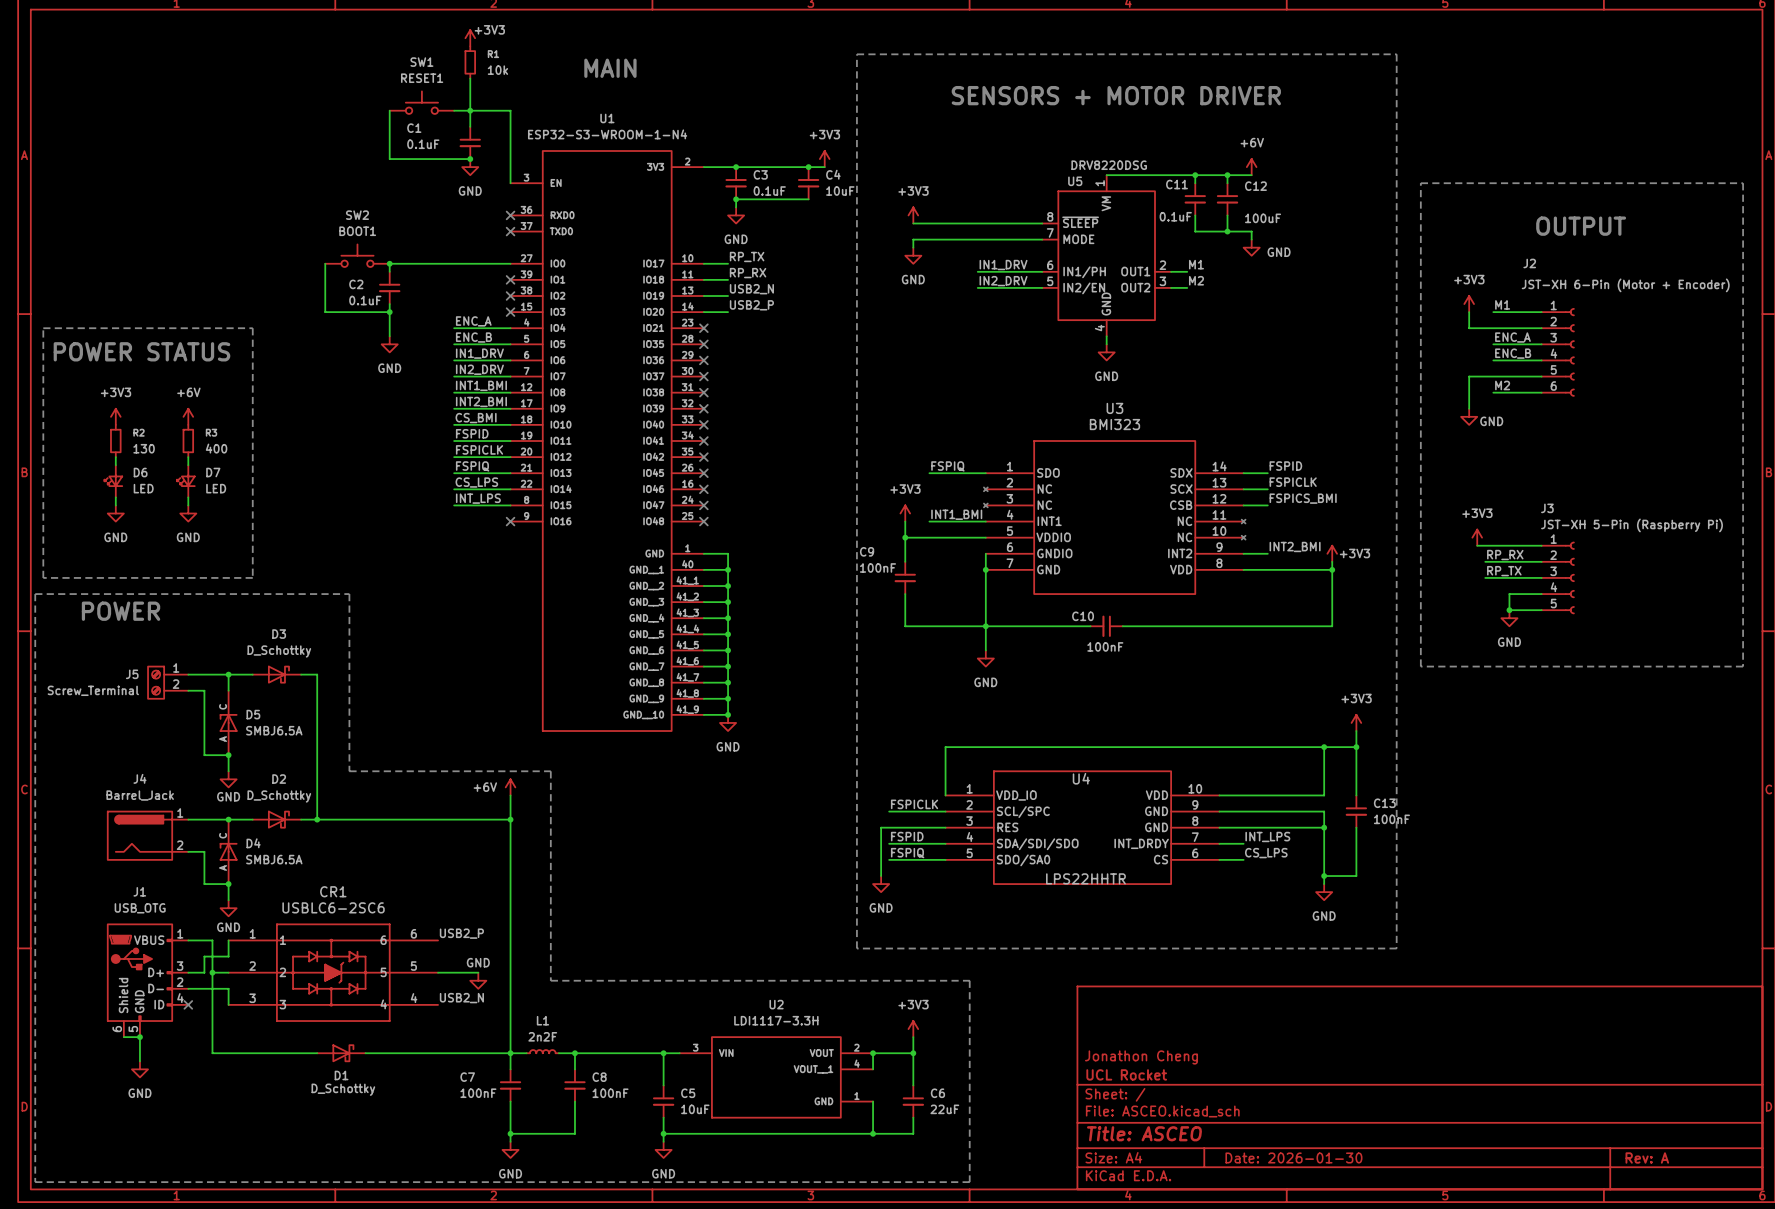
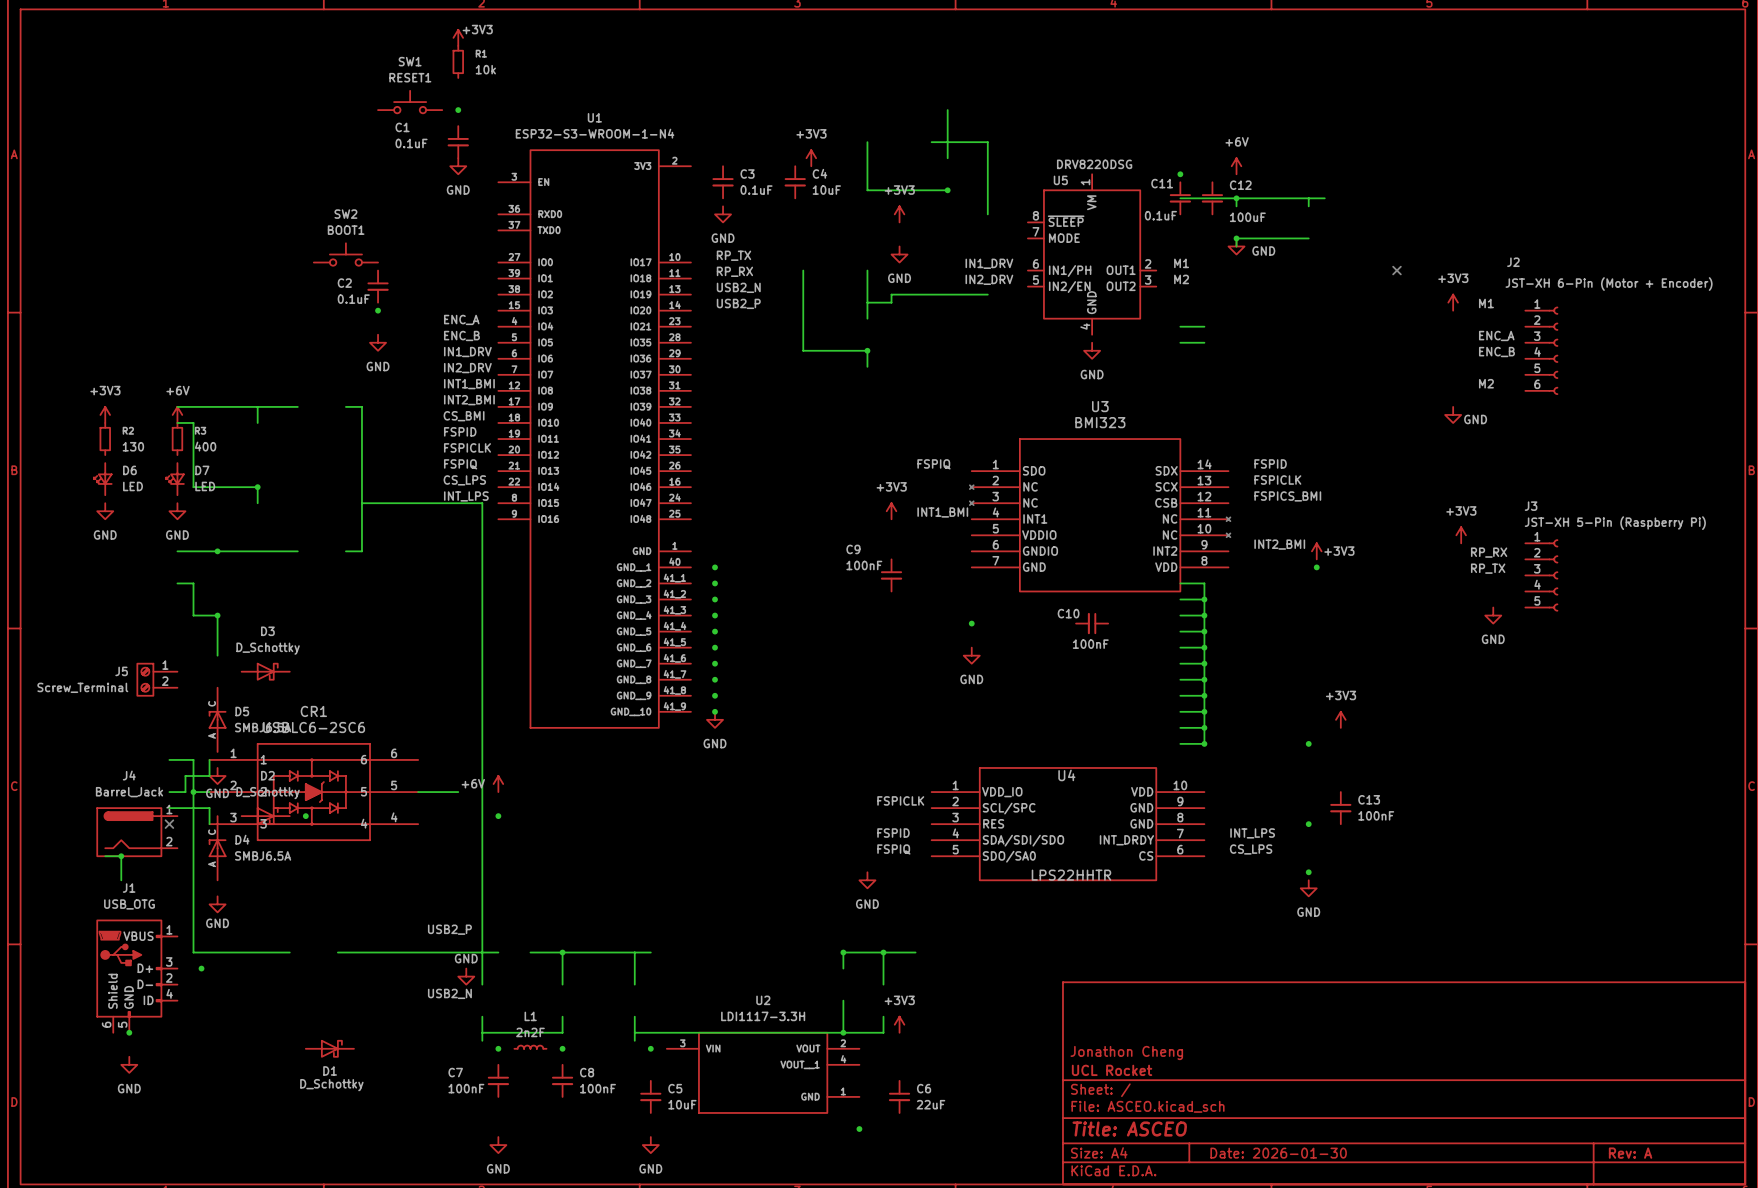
line: (856, 54) (1396, 54) (1396, 948) (856, 948) (856, 54) -> none
text: MAIN (610, 68) -> none
wire: (470, 78) (470, 126) -> none
text: SENSORS + MOTOR DRIVER (1116, 95) -> none
wire: (389, 110) (389, 159) (470, 159) -> none
wire: (454, 110) (510, 110) (510, 183) -> none
wire: none -> (947, 110) (947, 158)
wire: none -> (867, 142) (867, 190) (947, 190)
wire: none -> (931, 142) (987, 142) (987, 214)
junction: (470, 159) -> none
wire: (703, 167) (824, 167) -> none
junction: (736, 167) -> none
junction: (808, 167) -> none
wire: (1106, 175) (1251, 175) -> (1180, 198) (1324, 198)
wire: (1195, 175) (1195, 183) -> (1308, 198) (1308, 206)
wire: (1227, 175) (1227, 183) -> (1236, 198) (1236, 206)
junction: (1227, 175) -> none
line: (1420, 183) (1743, 183) (1743, 666) (1420, 666) (1420, 183) -> none
junction: none -> (947, 190)
junction: (736, 199) -> none
wire: (808, 199) (736, 199) (736, 207) -> none
junction: none -> (1236, 198)
no-connect mark: (510, 215) -> none
wire: (1195, 215) (1195, 231) (1251, 231) (1251, 239) -> none
wire: (1227, 215) (1227, 231) -> none
wire: (913, 223) (1042, 223) -> none
text: OUTPUT (1581, 226) -> none
no-connect mark: (510, 231) -> none
junction: (1227, 231) -> none
wire: (1042, 239) (913, 239) (913, 247) -> none
junction: none -> (1236, 238)
wire: none -> (1308, 238) (1236, 238) (1236, 246)
wire: (325, 263) (325, 312) (389, 312) -> none
junction: (389, 263) -> none
wire: (510, 263) (389, 263) (389, 271) -> none
wire: (703, 263) (728, 263) -> none
wire: none -> (803, 270) (803, 350) (867, 350) (867, 366)
wire: none -> (867, 270) (867, 318)
wire: (977, 271) (1042, 271) -> none
wire: (1171, 271) (1187, 271) -> none
no-connect mark: none -> (1396, 270)
no-connect mark: (510, 279) -> none
wire: (703, 279) (728, 279) -> none
wire: (977, 287) (1042, 287) -> none
wire: (1171, 287) (1187, 287) -> none
no-connect mark: (510, 296) -> none
wire: (703, 296) (728, 296) -> none
wire: none -> (987, 294) (891, 294) (891, 302) (867, 302)
wire: (389, 304) (389, 336) -> none
no-connect mark: (510, 312) -> none
wire: (703, 312) (728, 312) -> none
wire: (1469, 312) (1469, 328) (1541, 328) -> none
wire: (1493, 312) (1541, 312) -> none
line: (43, 328) (252, 328) (252, 577) (43, 577) (43, 328) -> none
wire: (454, 328) (510, 328) -> none
no-connect mark: (703, 328) -> none
wire: none -> (1180, 326) (1204, 326)
wire: (1106, 336) (1106, 344) -> none
wire: (454, 344) (510, 344) -> none
no-connect mark: (703, 344) -> none
wire: none -> (1180, 342) (1204, 342)
wire: (1493, 344) (1541, 344) -> none
text: POWER STATUS (141, 351) -> none
junction: none -> (867, 350)
wire: (454, 360) (510, 360) -> none
no-connect mark: (703, 360) -> none
wire: (1493, 360) (1541, 360) -> none
wire: (454, 376) (510, 376) -> none
no-connect mark: (703, 376) -> none
wire: (1541, 376) (1469, 376) (1469, 408) -> none
wire: (454, 392) (510, 392) -> none
no-connect mark: (703, 392) -> none
wire: (1493, 392) (1541, 392) -> none
wire: none -> (177, 406) (297, 406)
wire: none -> (257, 406) (257, 422)
wire: none -> (345, 406) (361, 406) (361, 551) (345, 551)
wire: (454, 408) (510, 408) -> none
no-connect mark: (703, 408) -> none
wire: none -> (177, 422) (193, 422) (193, 487) (257, 487) (257, 503)
wire: (454, 424) (510, 424) -> none
no-connect mark: (703, 424) -> none
wire: (454, 441) (510, 441) -> none
no-connect mark: (703, 441) -> none
wire: (115, 457) (115, 465) -> none
wire: (188, 457) (188, 465) -> none
wire: (454, 457) (510, 457) -> none
no-connect mark: (703, 457) -> none
wire: (454, 473) (510, 473) -> none
no-connect mark: (703, 473) -> none
wire: (929, 473) (985, 473) -> none
wire: (1243, 473) (1267, 473) -> (1180, 599) (1204, 599)
junction: none -> (257, 487)
wire: (454, 489) (510, 489) -> none
no-connect mark: (703, 489) -> none
wire: (1243, 489) (1267, 489) -> (1180, 615) (1204, 615)
wire: (115, 497) (115, 505) -> none
wire: (188, 497) (188, 505) -> none
wire: none -> (361, 503) (442, 503)
wire: (494, 505) (510, 505) -> (482, 503) (482, 984)
no-connect mark: (703, 505) -> none
wire: (1243, 505) (1267, 505) -> (1180, 631) (1204, 631)
no-connect mark: (510, 521) -> none
no-connect mark: (703, 521) -> none
wire: (905, 521) (905, 561) -> none
wire: (929, 521) (985, 521) -> none
wire: (905, 537) (985, 537) -> none
junction: (905, 537) -> none
wire: (1477, 545) (1541, 545) -> none
wire: none -> (177, 551) (297, 551)
junction: none -> (217, 551)
wire: (703, 553) (728, 553) (728, 714) (703, 714) -> none
wire: (985, 553) (985, 650) -> none
wire: (1243, 553) (1267, 553) -> (1180, 679) (1204, 679)
wire: (1332, 561) (1332, 626) (1122, 626) -> none
wire: (1485, 561) (1541, 561) -> none
wire: (703, 569) (728, 569) -> none
junction: (985, 569) -> none
wire: (1243, 569) (1332, 569) -> none
wire: (1485, 577) (1541, 577) -> none
wire: none -> (177, 583) (193, 583) (193, 615) (217, 615) (217, 655)
wire: (703, 586) (728, 586) -> none
line: (35, 594) (35, 1182) (969, 1182) (969, 980) (550, 980) (550, 771) (349, 771) (349, 594) (35, 594) -> none
wire: (905, 594) (905, 626) (1090, 626) -> none
wire: (1541, 594) (1509, 594) (1509, 610) (1541, 610) -> none
wire: (703, 602) (728, 602) -> none
junction: none -> (1204, 599)
junction: (1509, 610) -> none
text: POWER (121, 611) -> none
junction: none -> (217, 615)
wire: (703, 618) (728, 618) -> none
junction: none -> (1204, 615)
wire: (703, 634) (728, 634) -> none
junction: none -> (1204, 631)
wire: (703, 650) (728, 650) -> none
wire: none -> (1180, 647) (1204, 647)
junction: none -> (1204, 647)
wire: (703, 666) (728, 666) -> none
wire: none -> (1180, 663) (1204, 663)
junction: none -> (1204, 663)
wire: (188, 674) (252, 674) -> none
wire: (228, 674) (228, 690) -> none
junction: (228, 674) -> none
wire: (301, 674) (317, 674) (317, 819) -> none
wire: (703, 682) (728, 682) -> none
junction: none -> (1204, 679)
wire: (188, 690) (204, 690) (204, 755) (228, 755) (228, 771) -> none
wire: (703, 698) (728, 698) -> none
wire: none -> (1180, 695) (1204, 695)
junction: none -> (1204, 695)
junction: none -> (1204, 711)
junction: none -> (1204, 727)
wire: (1356, 731) (1356, 795) -> none
wire: (1195, 747) (945, 747) (945, 795) -> none
wire: (1219, 747) (1356, 747) -> (1204, 743) (1204, 583) (1180, 583)
junction: none -> (1204, 743)
wire: (1324, 747) (1324, 795) (1219, 795) -> none
junction: (1356, 747) -> none
junction: (228, 755) -> none
wire: none -> (209, 759) (209, 776) (185, 776) (185, 792) (169, 792)
wire: none -> (193, 792) (209, 792)
junction: none -> (193, 792)
wire: none -> (418, 792) (458, 792)
wire: (510, 795) (510, 1069) -> none
wire: none -> (169, 808) (209, 808) (209, 824)
wire: (889, 811) (945, 811) -> none
wire: (1219, 811) (1324, 811) (1324, 884) -> none
wire: (188, 819) (252, 819) -> none
junction: (228, 819) -> none
wire: (301, 819) (510, 819) -> none
no-connect mark: none -> (169, 824)
wire: (945, 827) (881, 827) (881, 876) -> none
wire: (1219, 827) (1324, 827) -> none
wire: (1356, 827) (1356, 876) (1324, 876) -> none
wire: (889, 843) (945, 843) -> none
wire: (1219, 843) (1243, 843) -> (1180, 711) (1204, 711)
wire: (188, 851) (204, 851) -> (169, 759) (193, 759) (193, 848)
wire: none -> (105, 856) (121, 856) (121, 880)
junction: none -> (121, 856)
wire: (889, 859) (945, 859) -> none
wire: (1219, 859) (1243, 859) -> (1180, 727) (1204, 727)
wire: (204, 884) (228, 884) (228, 900) -> (193, 880) (193, 952)
junction: (228, 884) -> none
wire: (188, 940) (212, 940) (212, 1053) (317, 1053) -> none
wire: (228, 940) (228, 956) -> (289, 952) (217, 952)
wire: (204, 956) (204, 972) (188, 972) -> none
wire: none -> (562, 952) (562, 984)
junction: none -> (562, 952)
junction: none -> (843, 952)
wire: none -> (883, 952) (883, 984)
junction: none -> (883, 952)
wire: none -> (915, 952) (843, 952) (843, 968)
wire: (212, 972) (228, 972) -> none
CR1 position: (333, 972) -> (313, 792)
wire: (438, 972) (478, 972) -> none
wire: (188, 988) (228, 988) (228, 1004) -> none
no-connect mark: (188, 1004) -> none
wire: none -> (482, 1016) (482, 1040)
wire: none -> (562, 1016) (562, 1032) (482, 1032)
wire: (123, 1037) (139, 1037) (139, 1061) -> none
wire: (913, 1037) (913, 1085) -> none
wire: (365, 1053) (526, 1053) -> (337, 952) (498, 952)
wire: (558, 1053) (679, 1053) -> (530, 952) (650, 952)
wire: (574, 1053) (574, 1069) -> none
wire: (663, 1053) (663, 1085) -> (634, 952) (634, 984)
junction position: (873, 1053) -> (843, 1032)
wire: (913, 1053) (873, 1053) (873, 1069) -> none
junction: (913, 1053) -> none
wire: (510, 1101) (510, 1141) -> none
wire: (574, 1101) (574, 1133) (510, 1133) -> none
wire: (873, 1101) (873, 1133) -> (843, 1000) (843, 1032)
wire: (663, 1117) (663, 1141) -> (634, 1016) (634, 1040)
wire: (913, 1117) (913, 1133) (663, 1133) -> (883, 1016) (883, 1032) (634, 1032)
junction: (510, 1133) -> none
junction: (663, 1133) -> none

